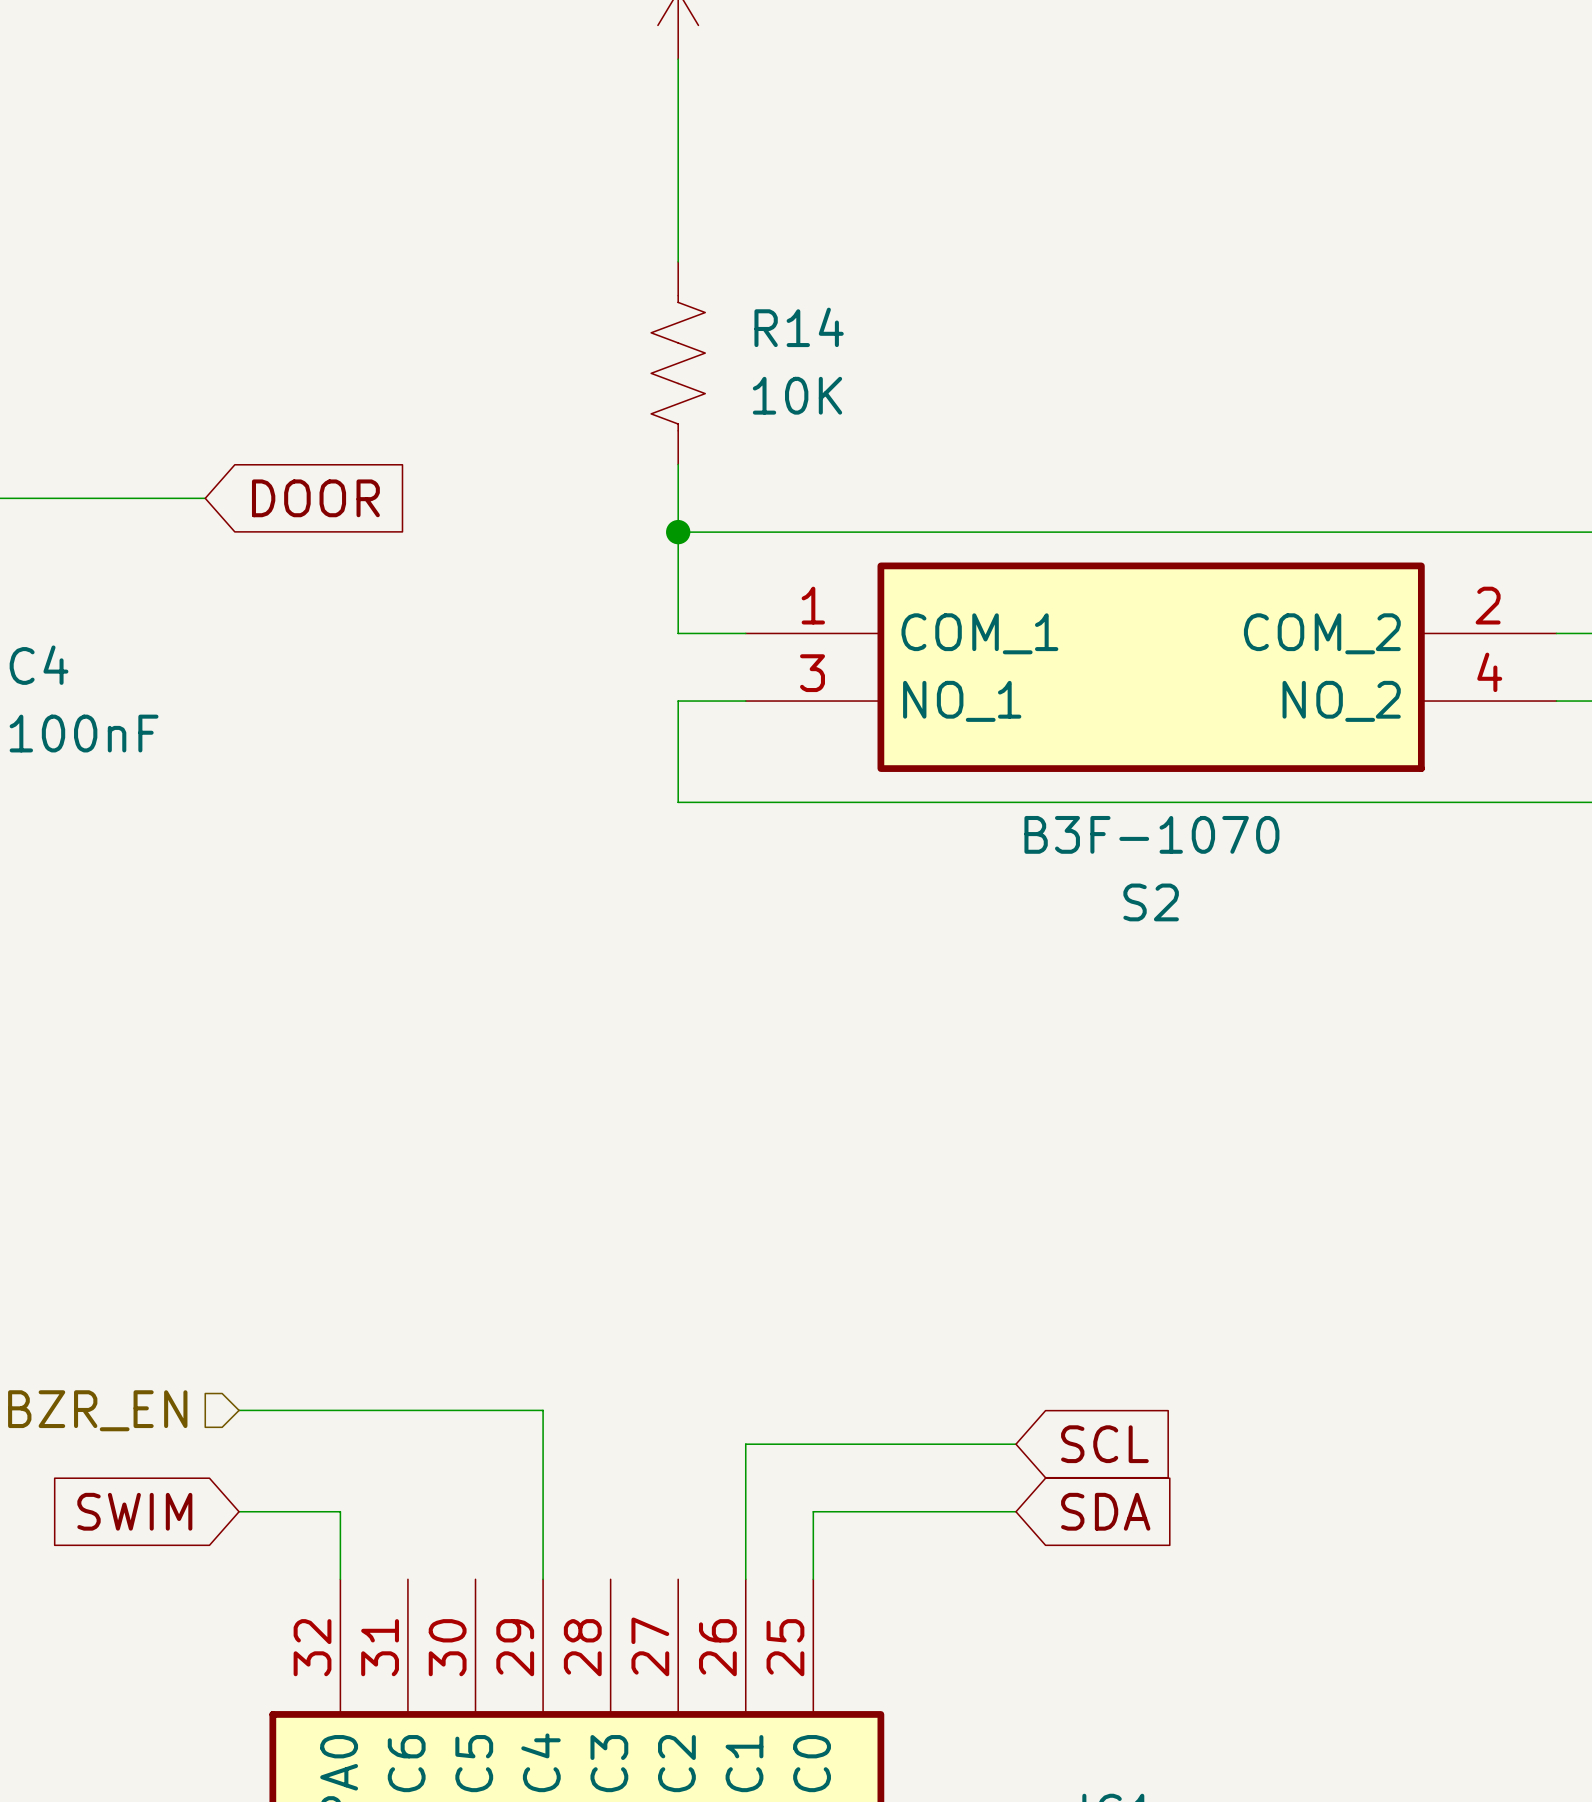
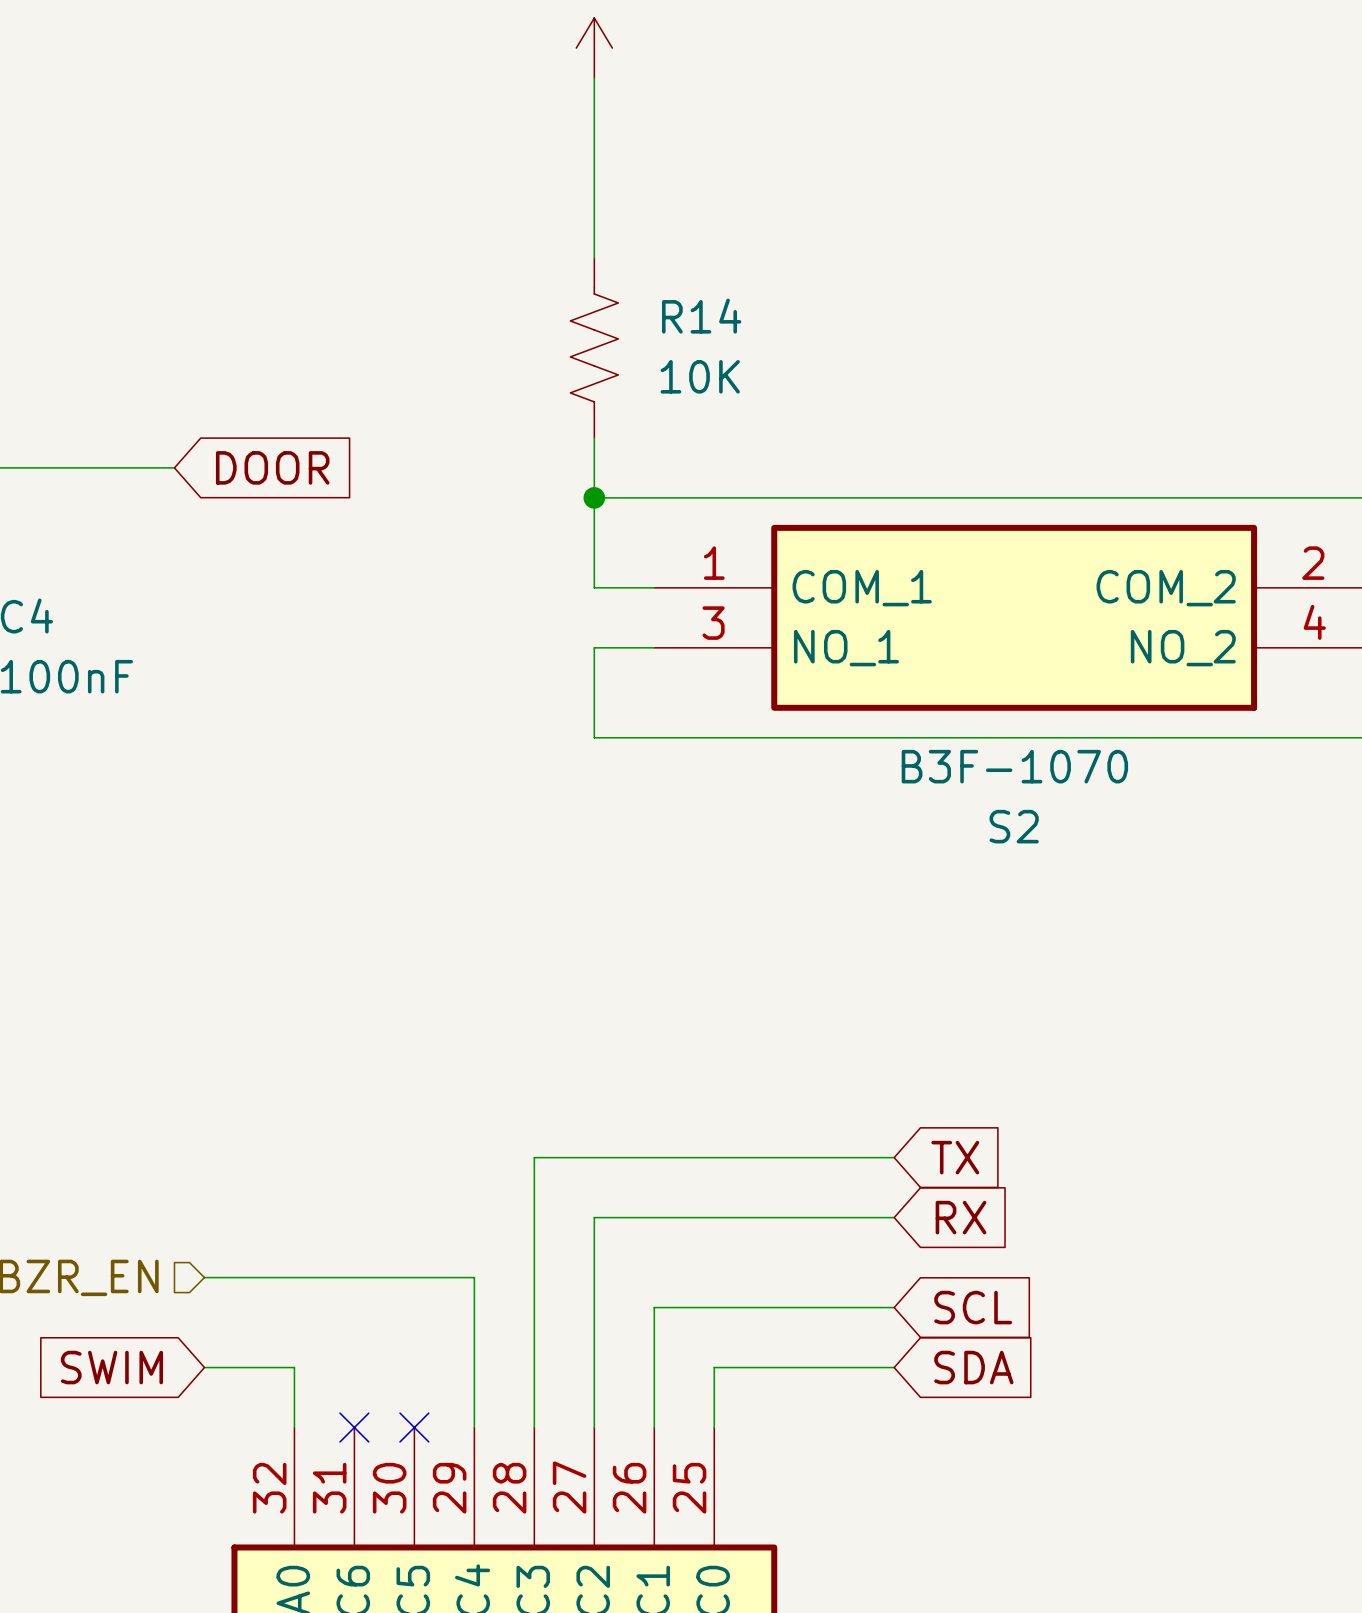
wire: none -> (894, 1157) (534, 1157) (534, 1427)
global label: none -> TX (955, 1157)
wire: none -> (894, 1217) (594, 1217) (594, 1427)
global label: none -> RX (961, 1217)
no-connect mark: none -> (354, 1427)
no-connect mark: none -> (414, 1427)

